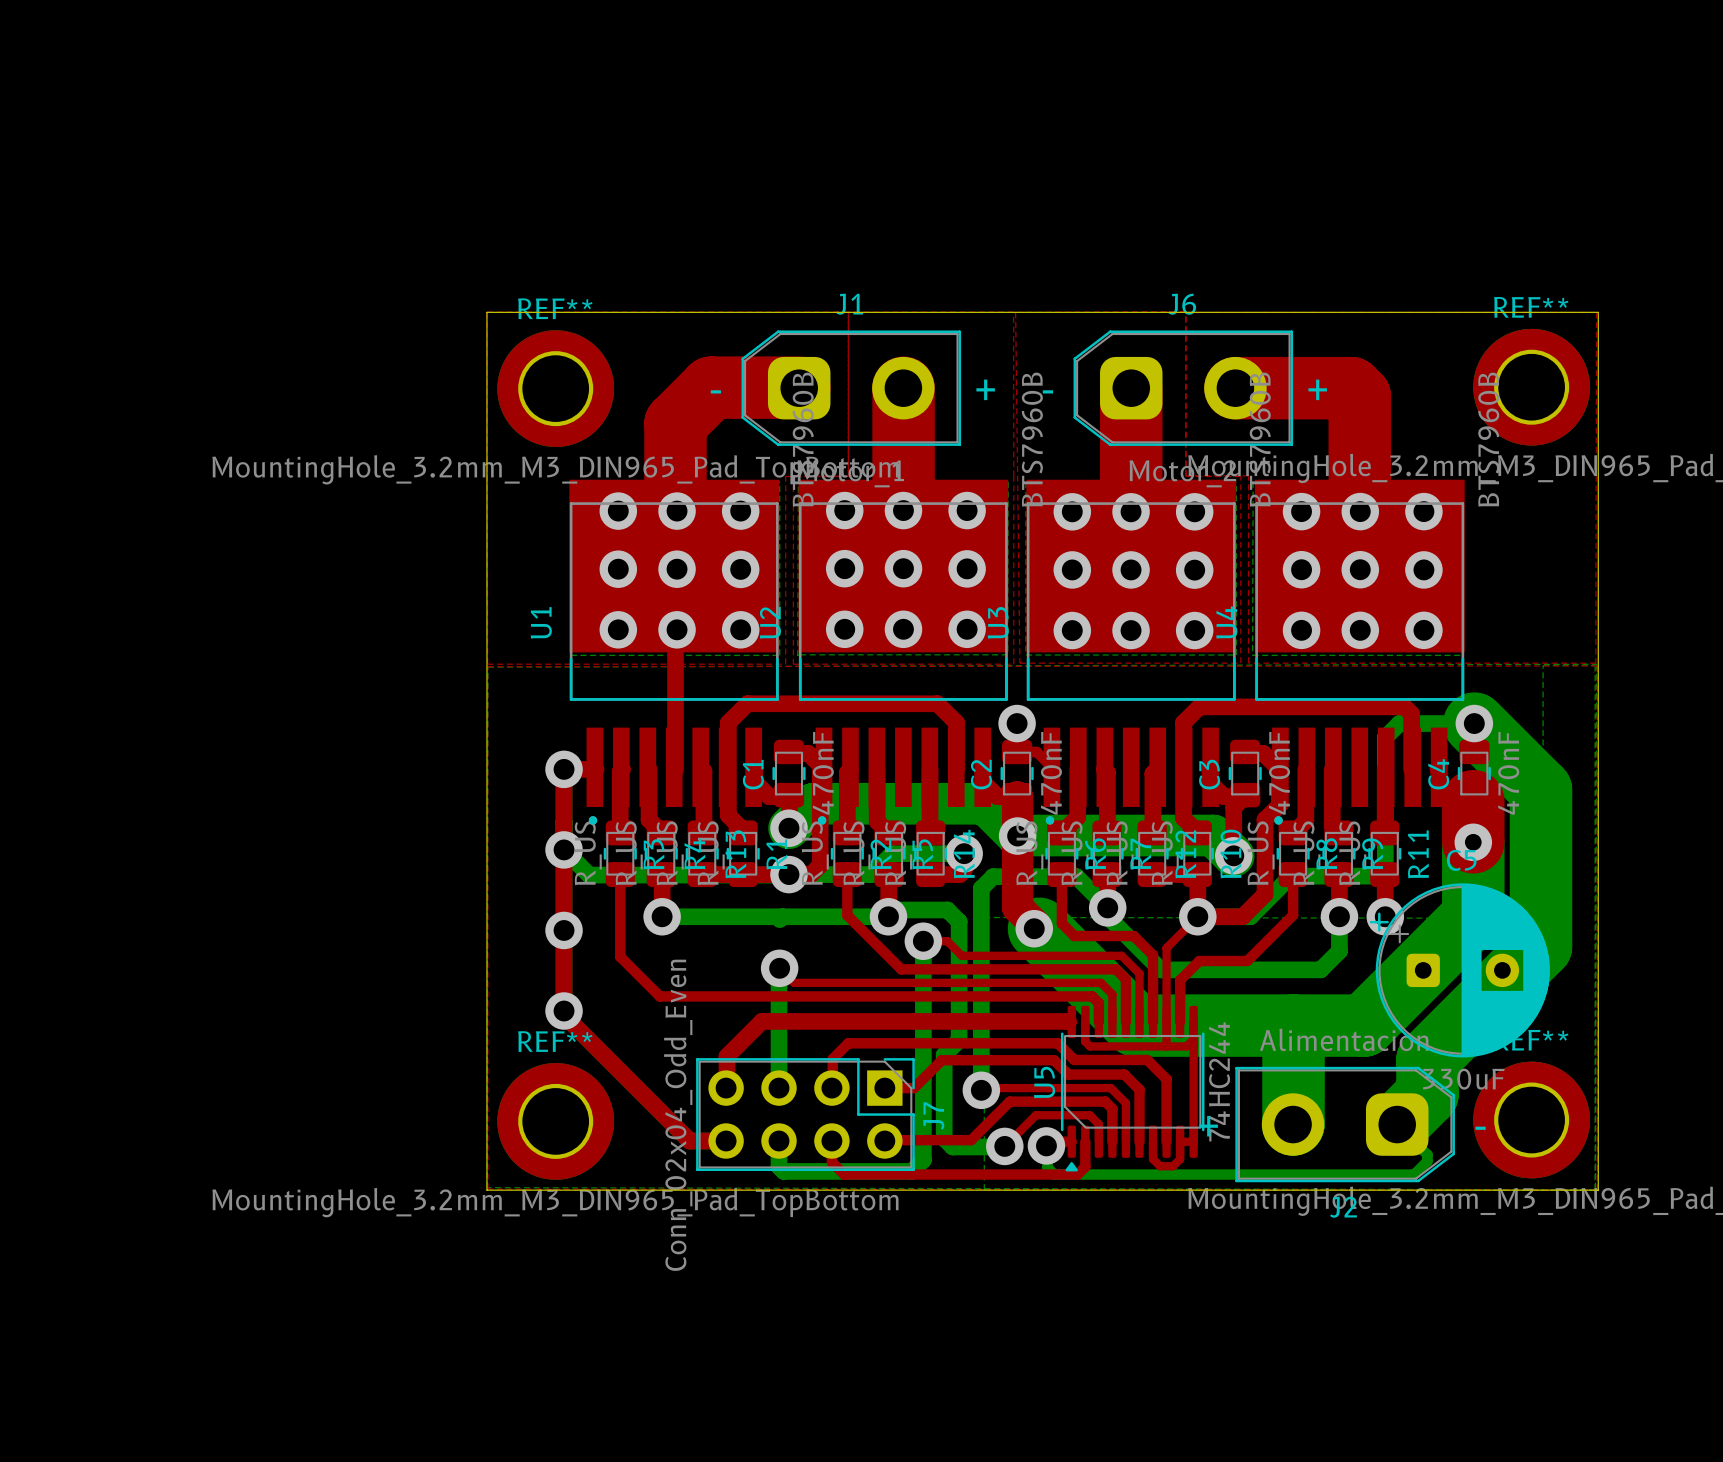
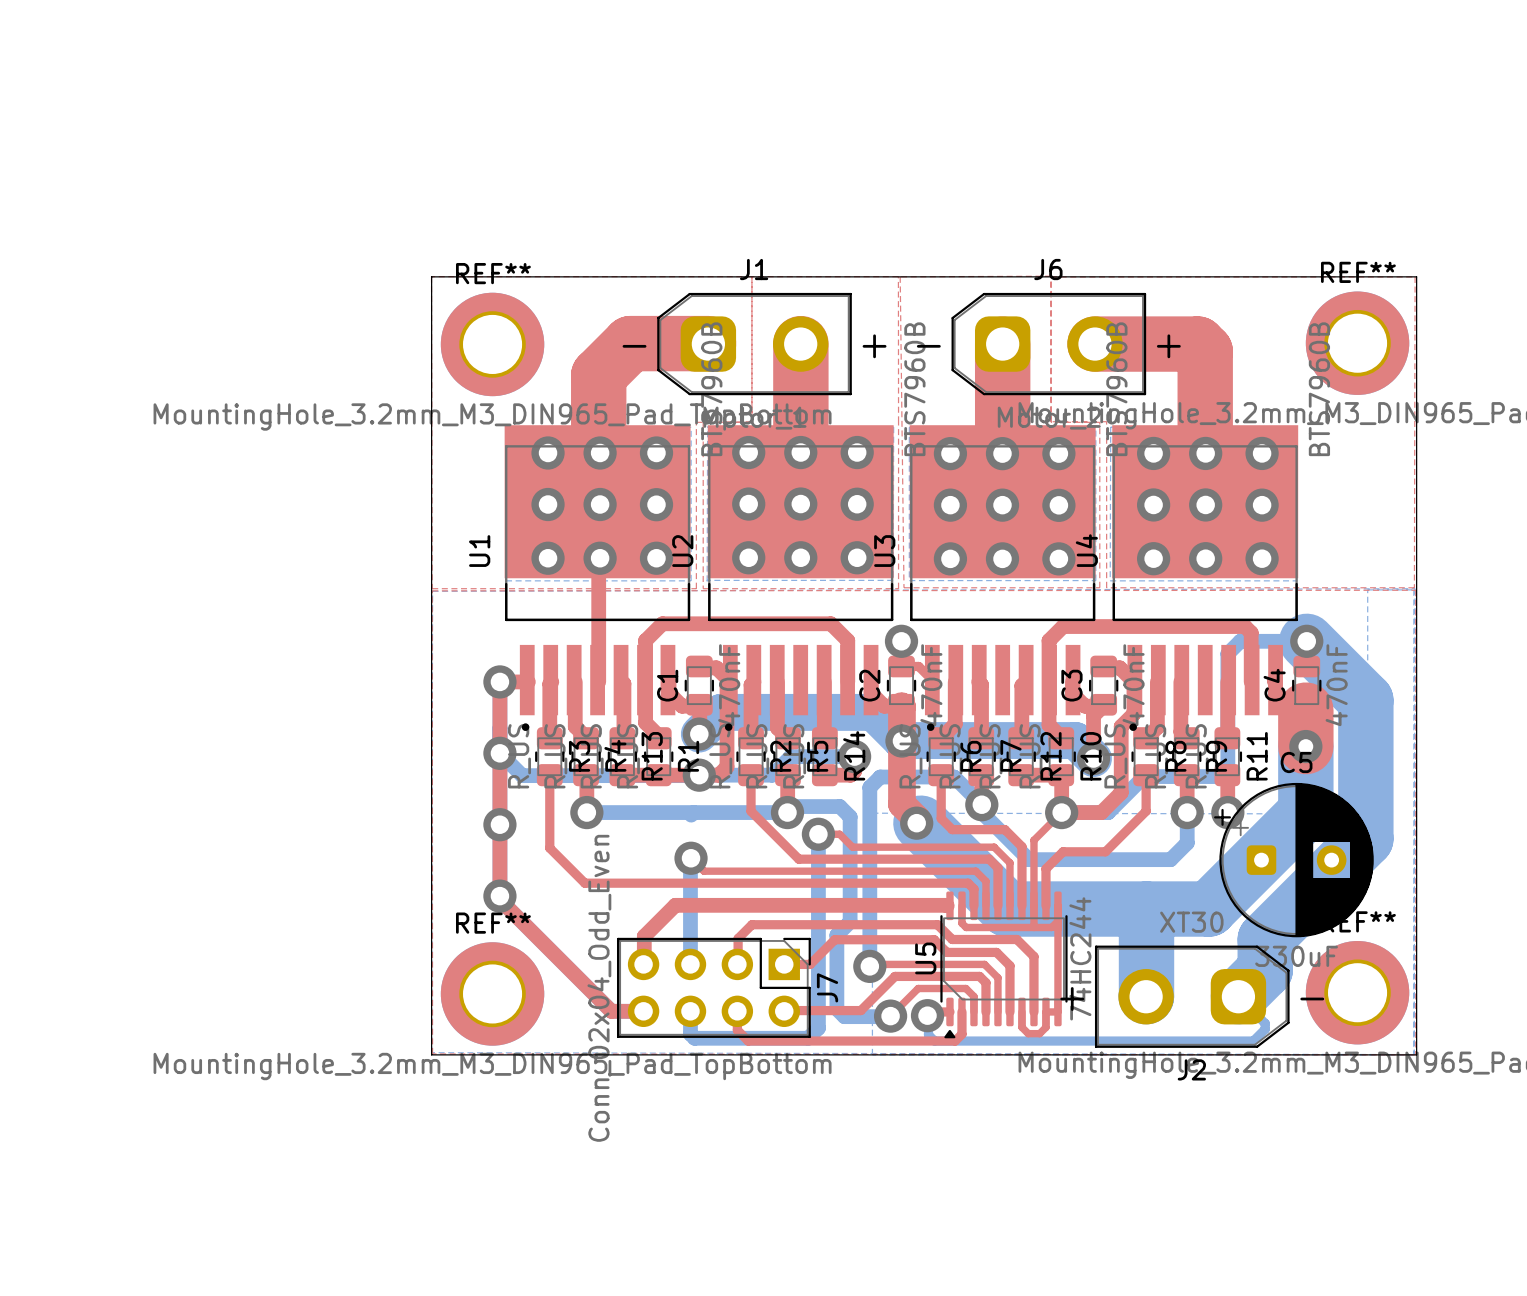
J2 value: Alimentacion (1344, 1039) -> XT30 (1191, 922)

